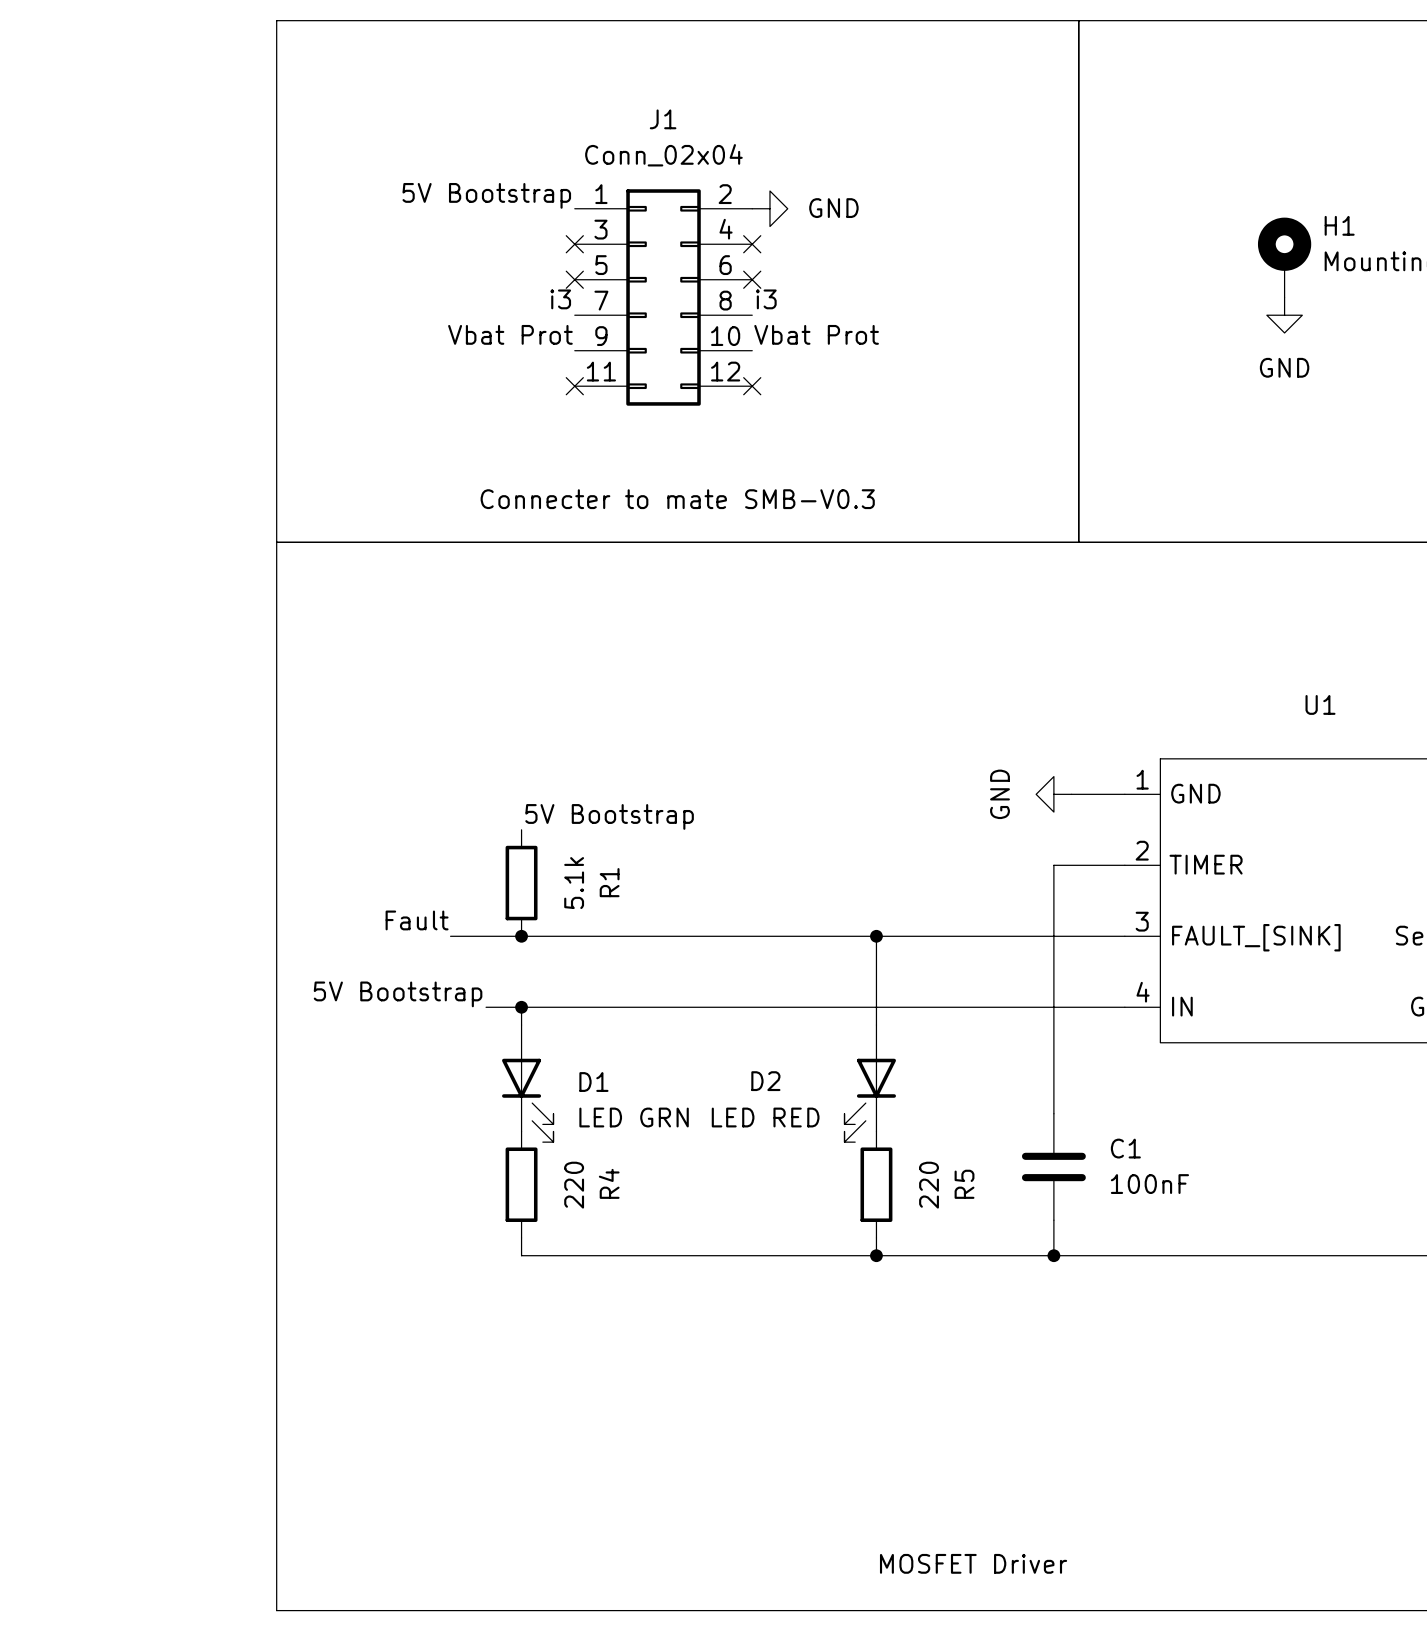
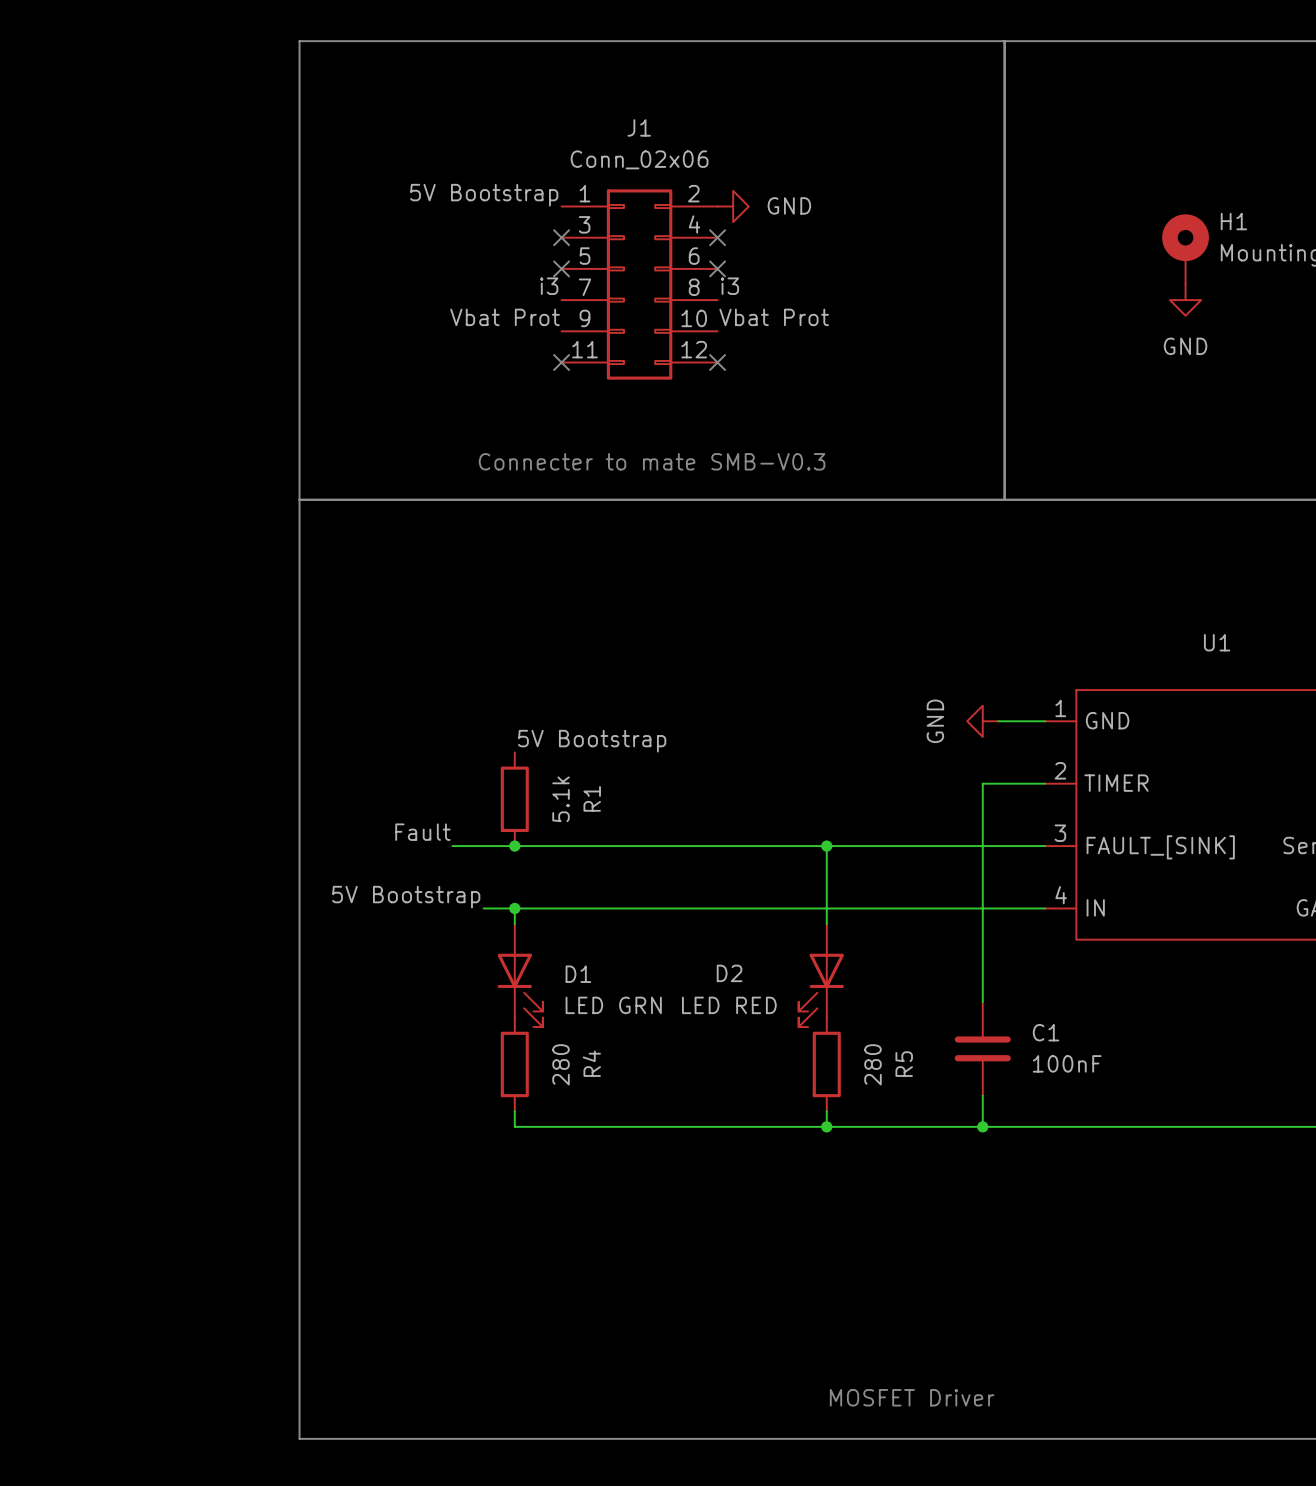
J1 value: Conn_02x04 (663, 155) -> Conn_02x06 (639, 159)
R4 value: 220 (574, 1185) -> 280 (561, 1064)
R5 value: 220 (929, 1185) -> 280 (872, 1064)

